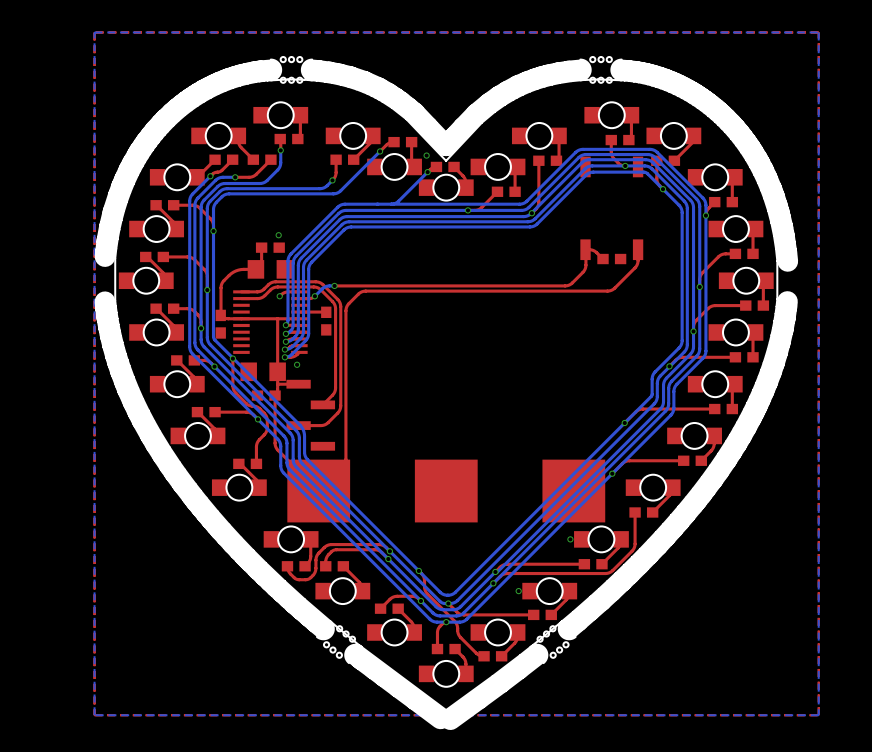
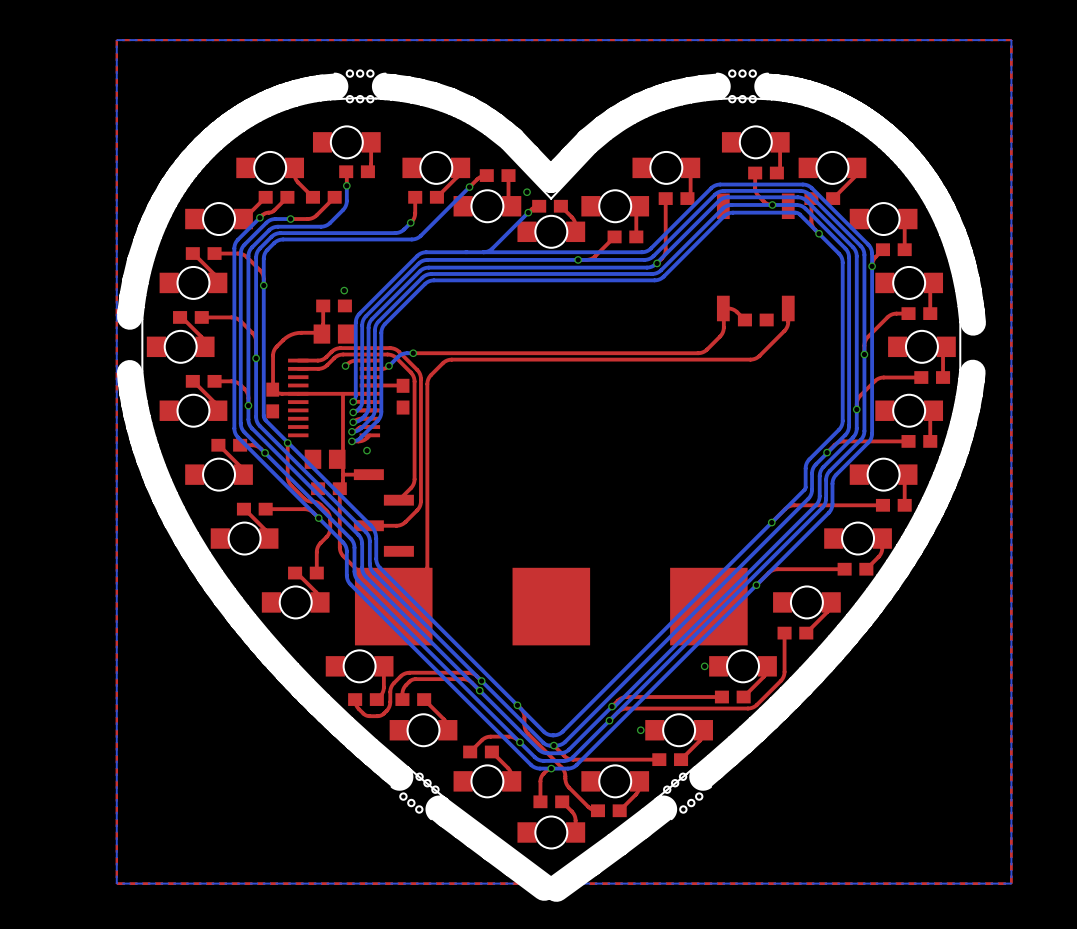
part footprint: [247, 260, 294, 279] -> [313, 324, 355, 344]
part footprint: [240, 362, 286, 382] -> [304, 449, 346, 469]

